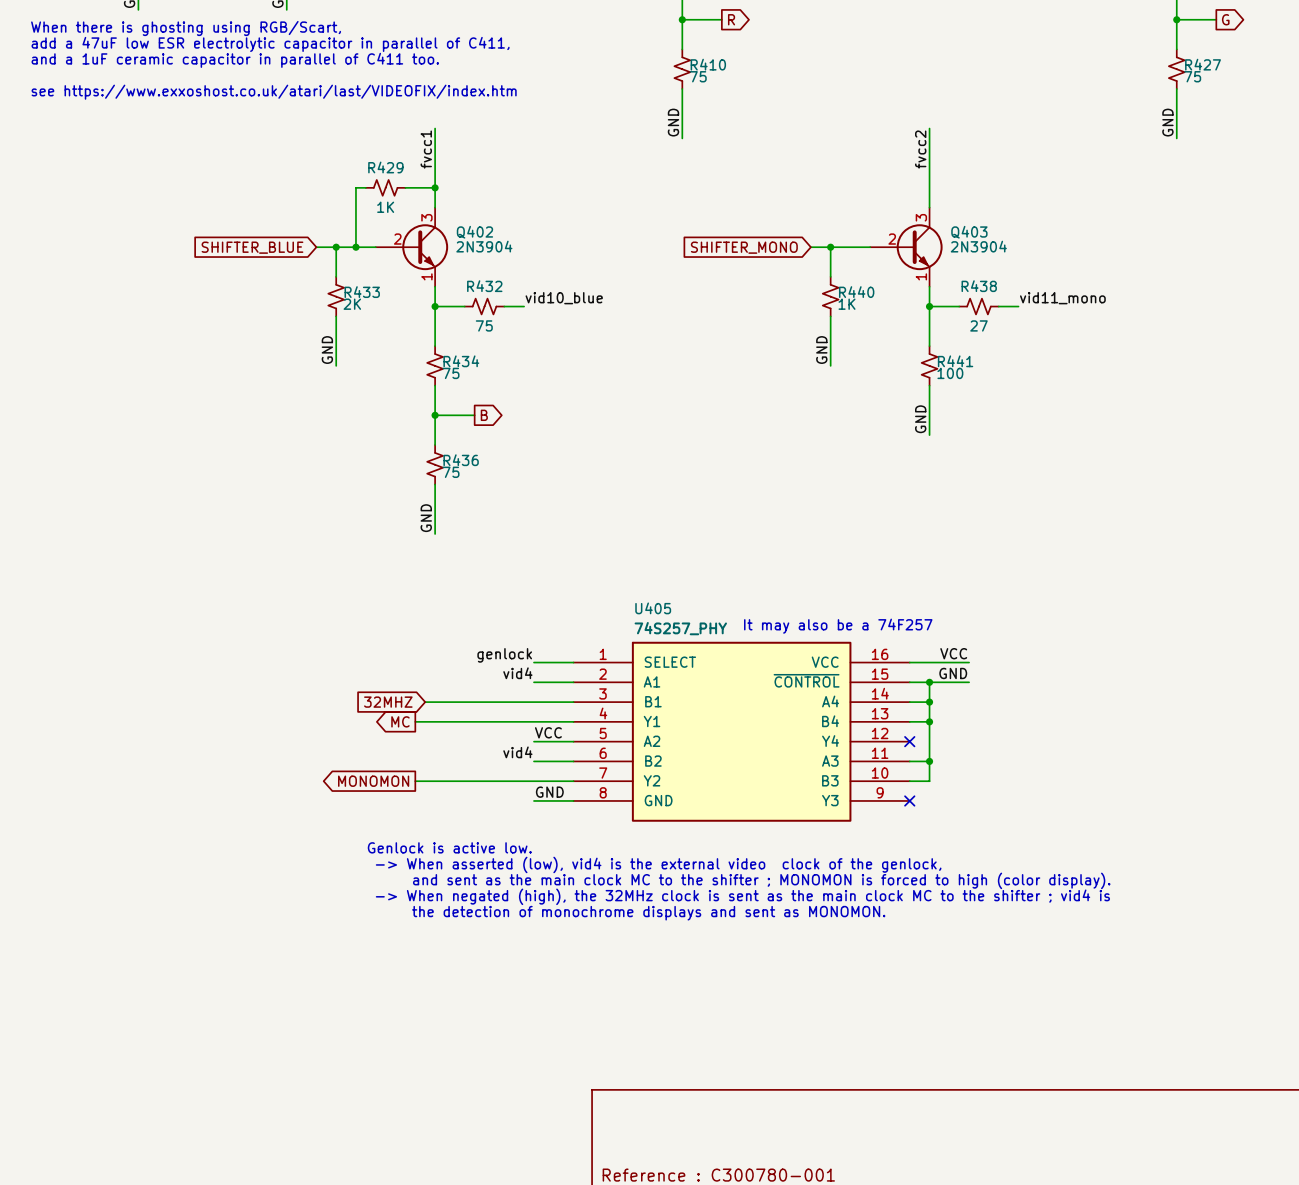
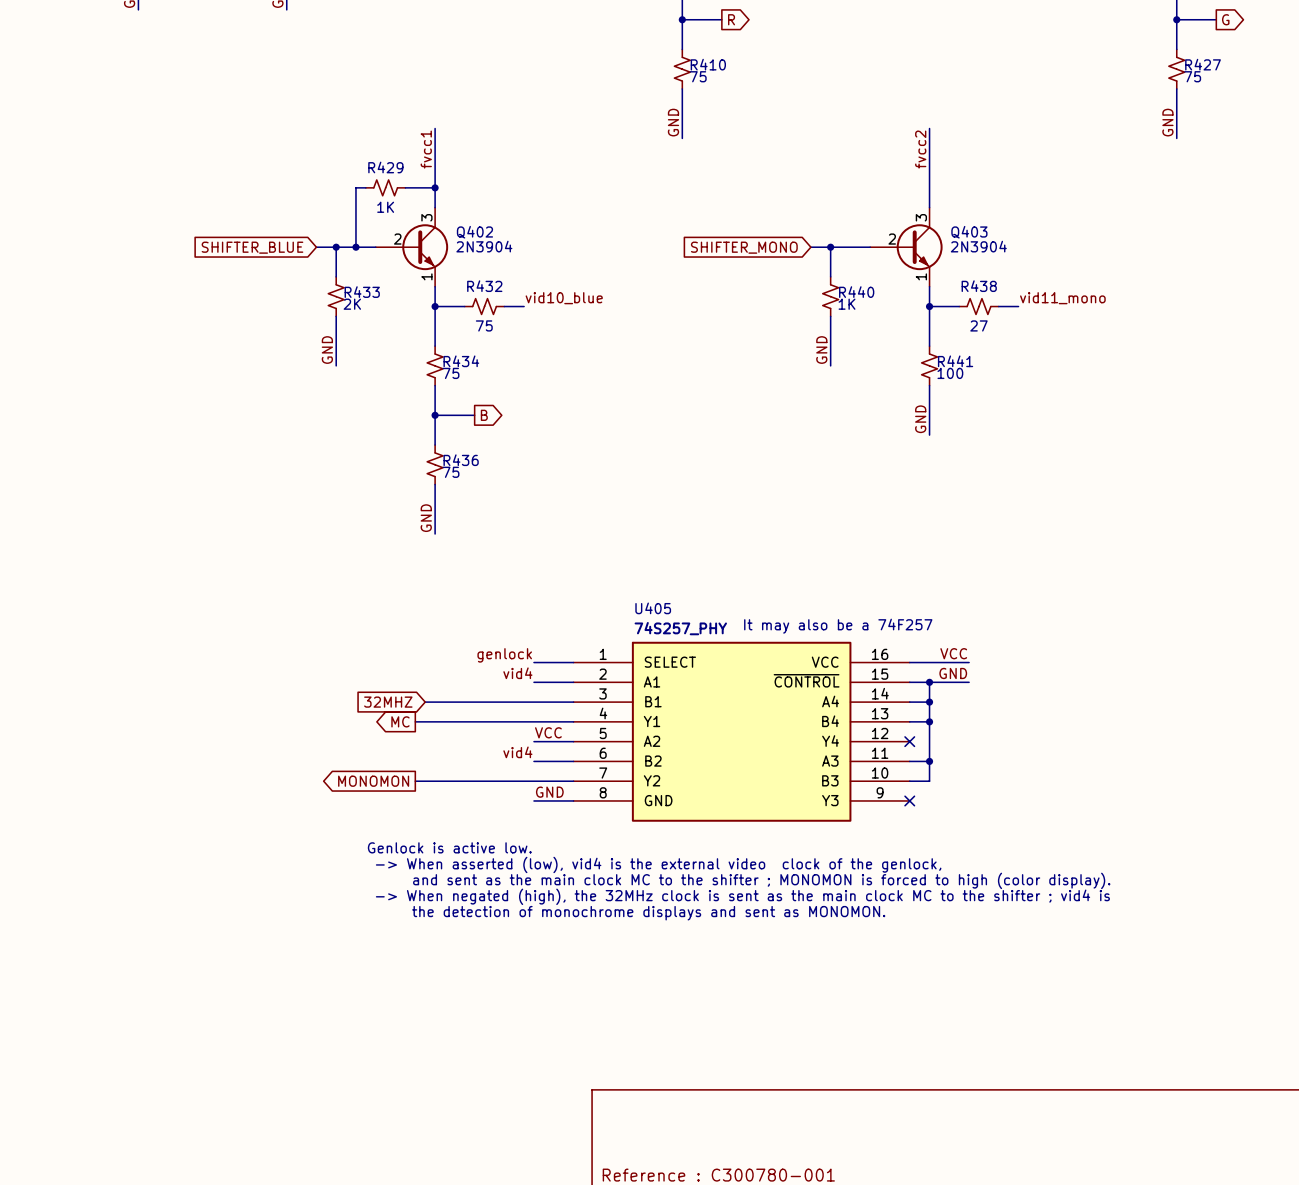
text: When there is ghosting using RGB/Scart, (186, 28) -> none
text: add a 47uF low ESR electrolytic capacitor in parallel of C411, (270, 44) -> none
text: and a 1uF ceramic capacitor in parallel of C411 too. (235, 60) -> none
text: see https://www.exxoshost.co.uk/atari/last/VIDEOFIX/index.htm (274, 92) -> none

